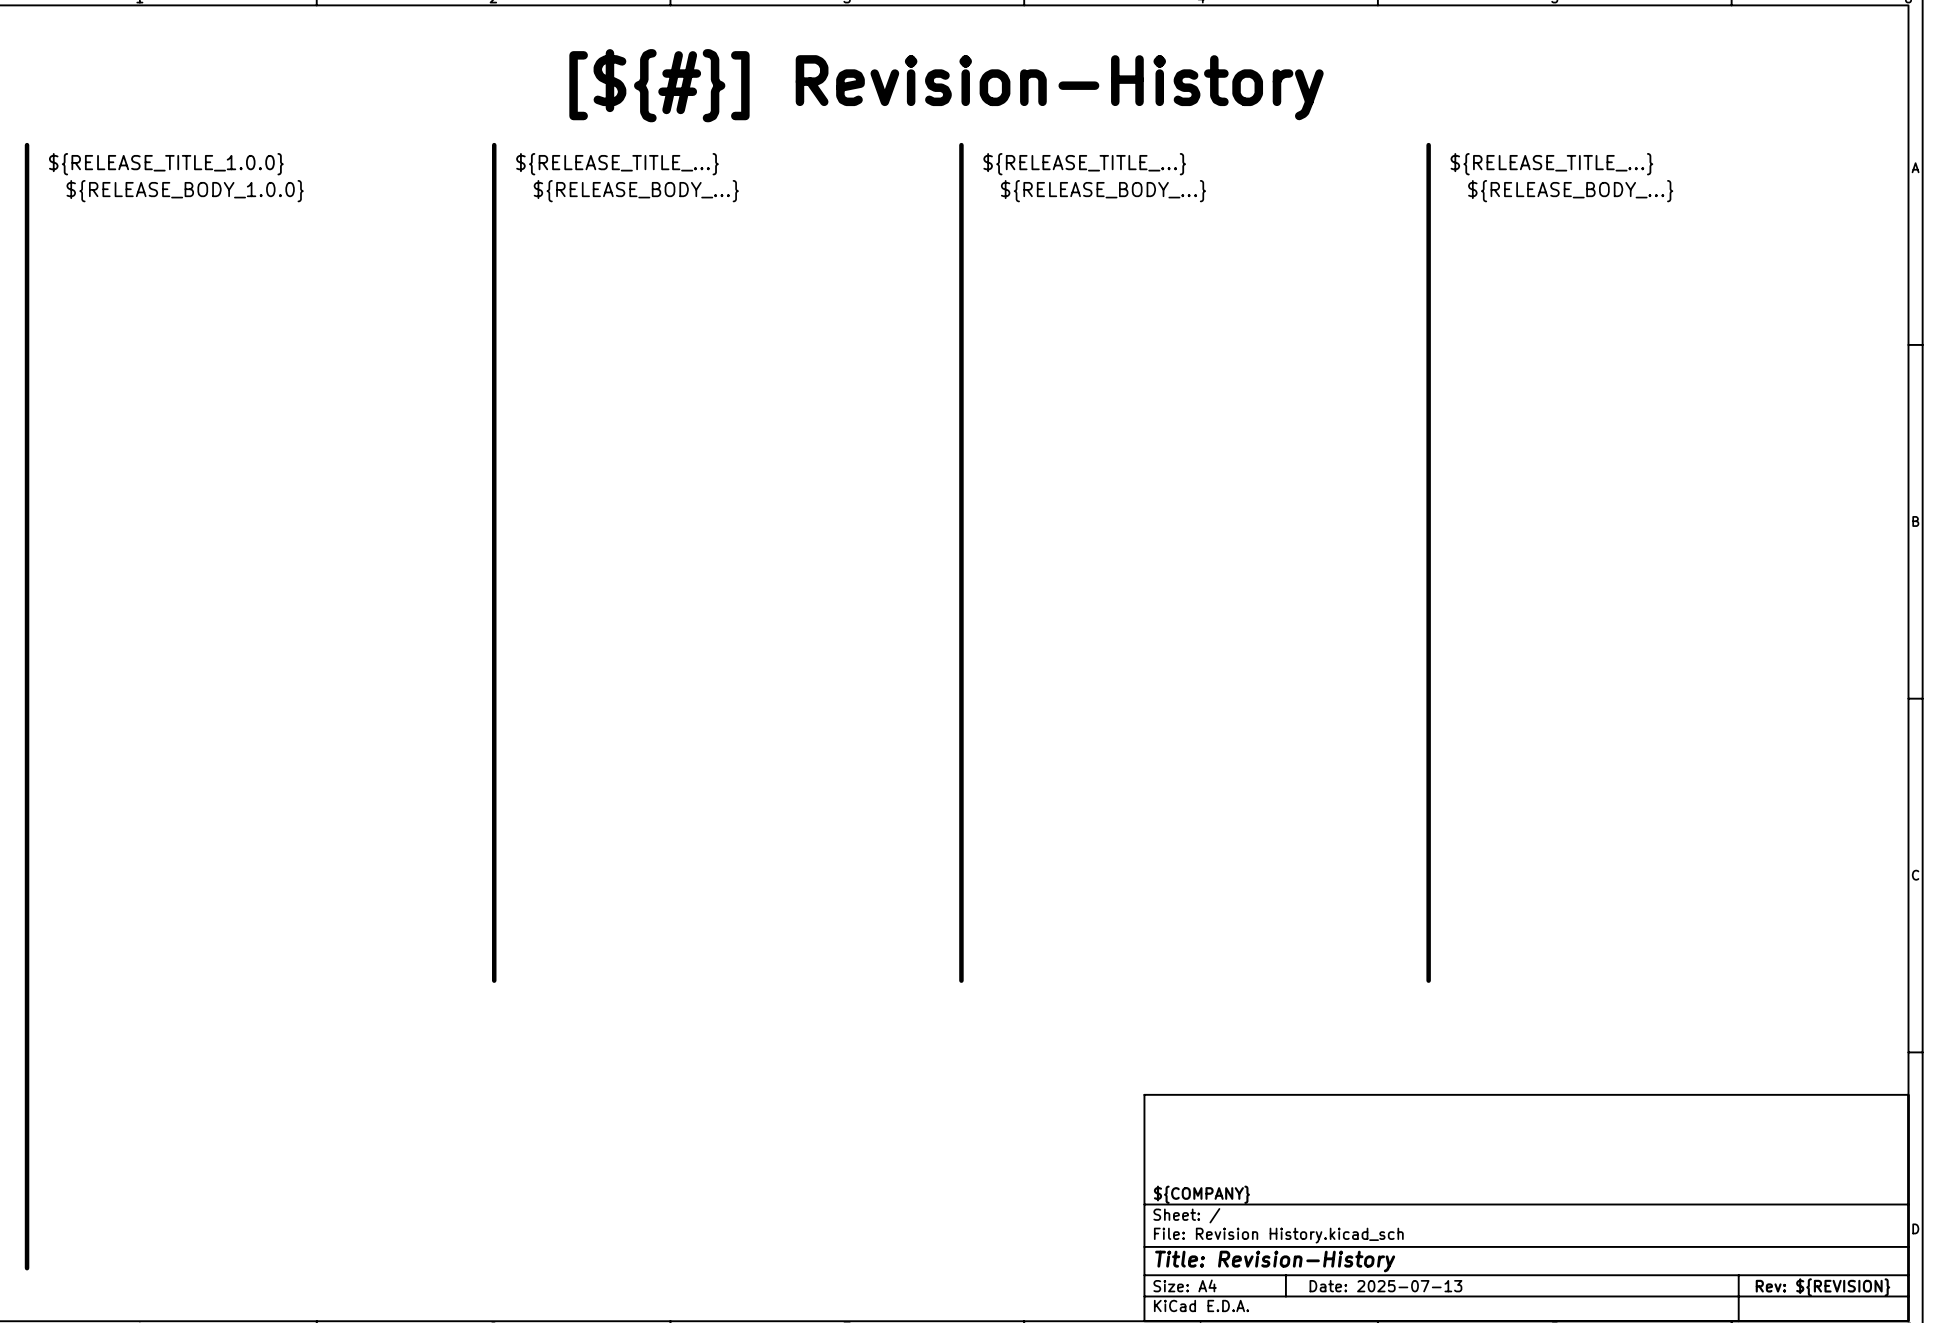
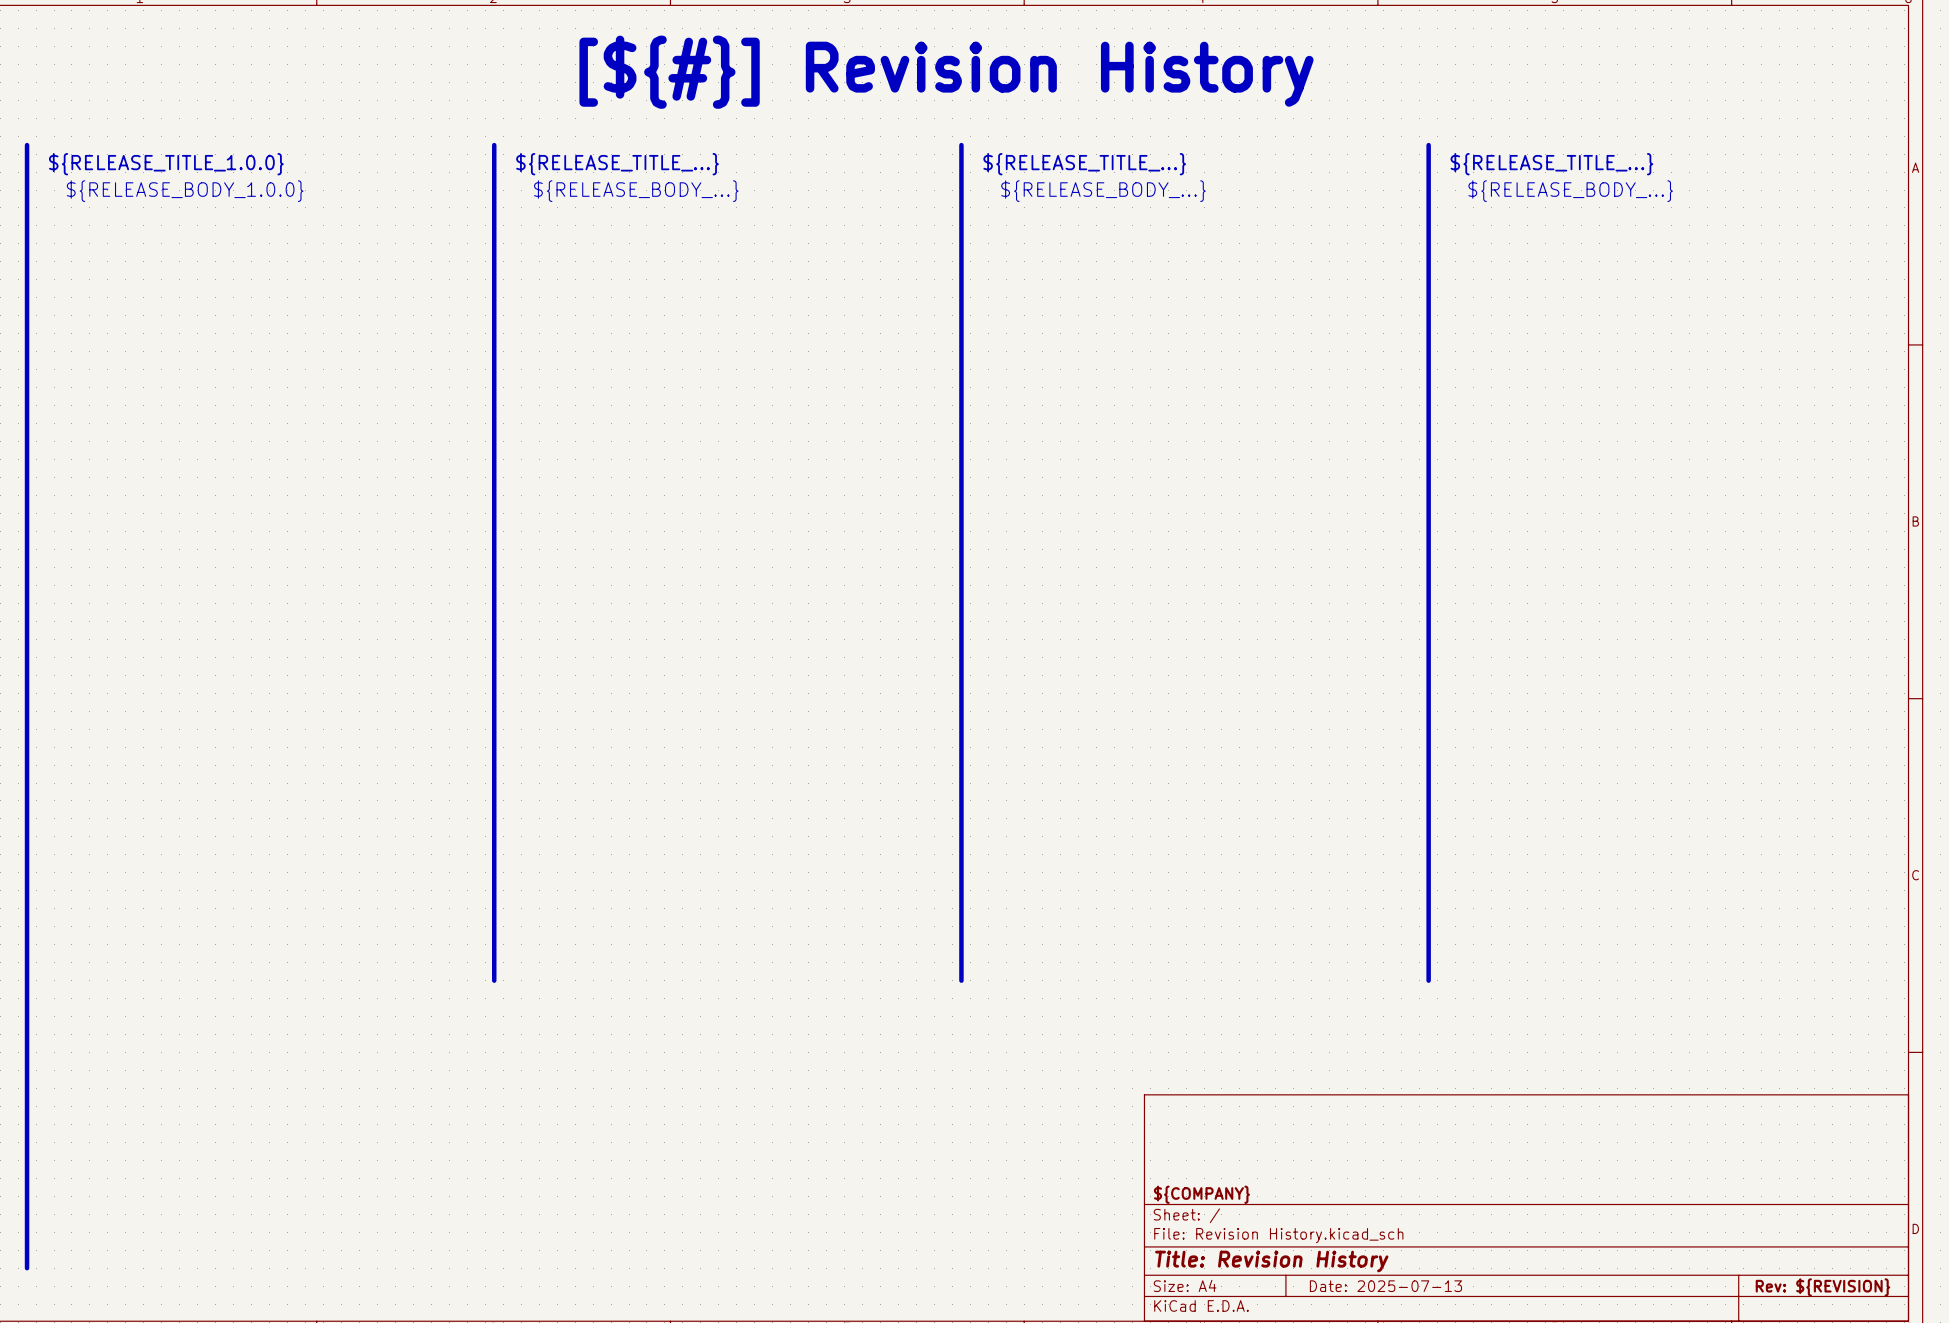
text: [${#}] Revision-History (946, 85) -> [${#}] Revision History (946, 72)
title block: Title: Revision-History (1275, 1261) -> Title: Revision History (1271, 1261)

